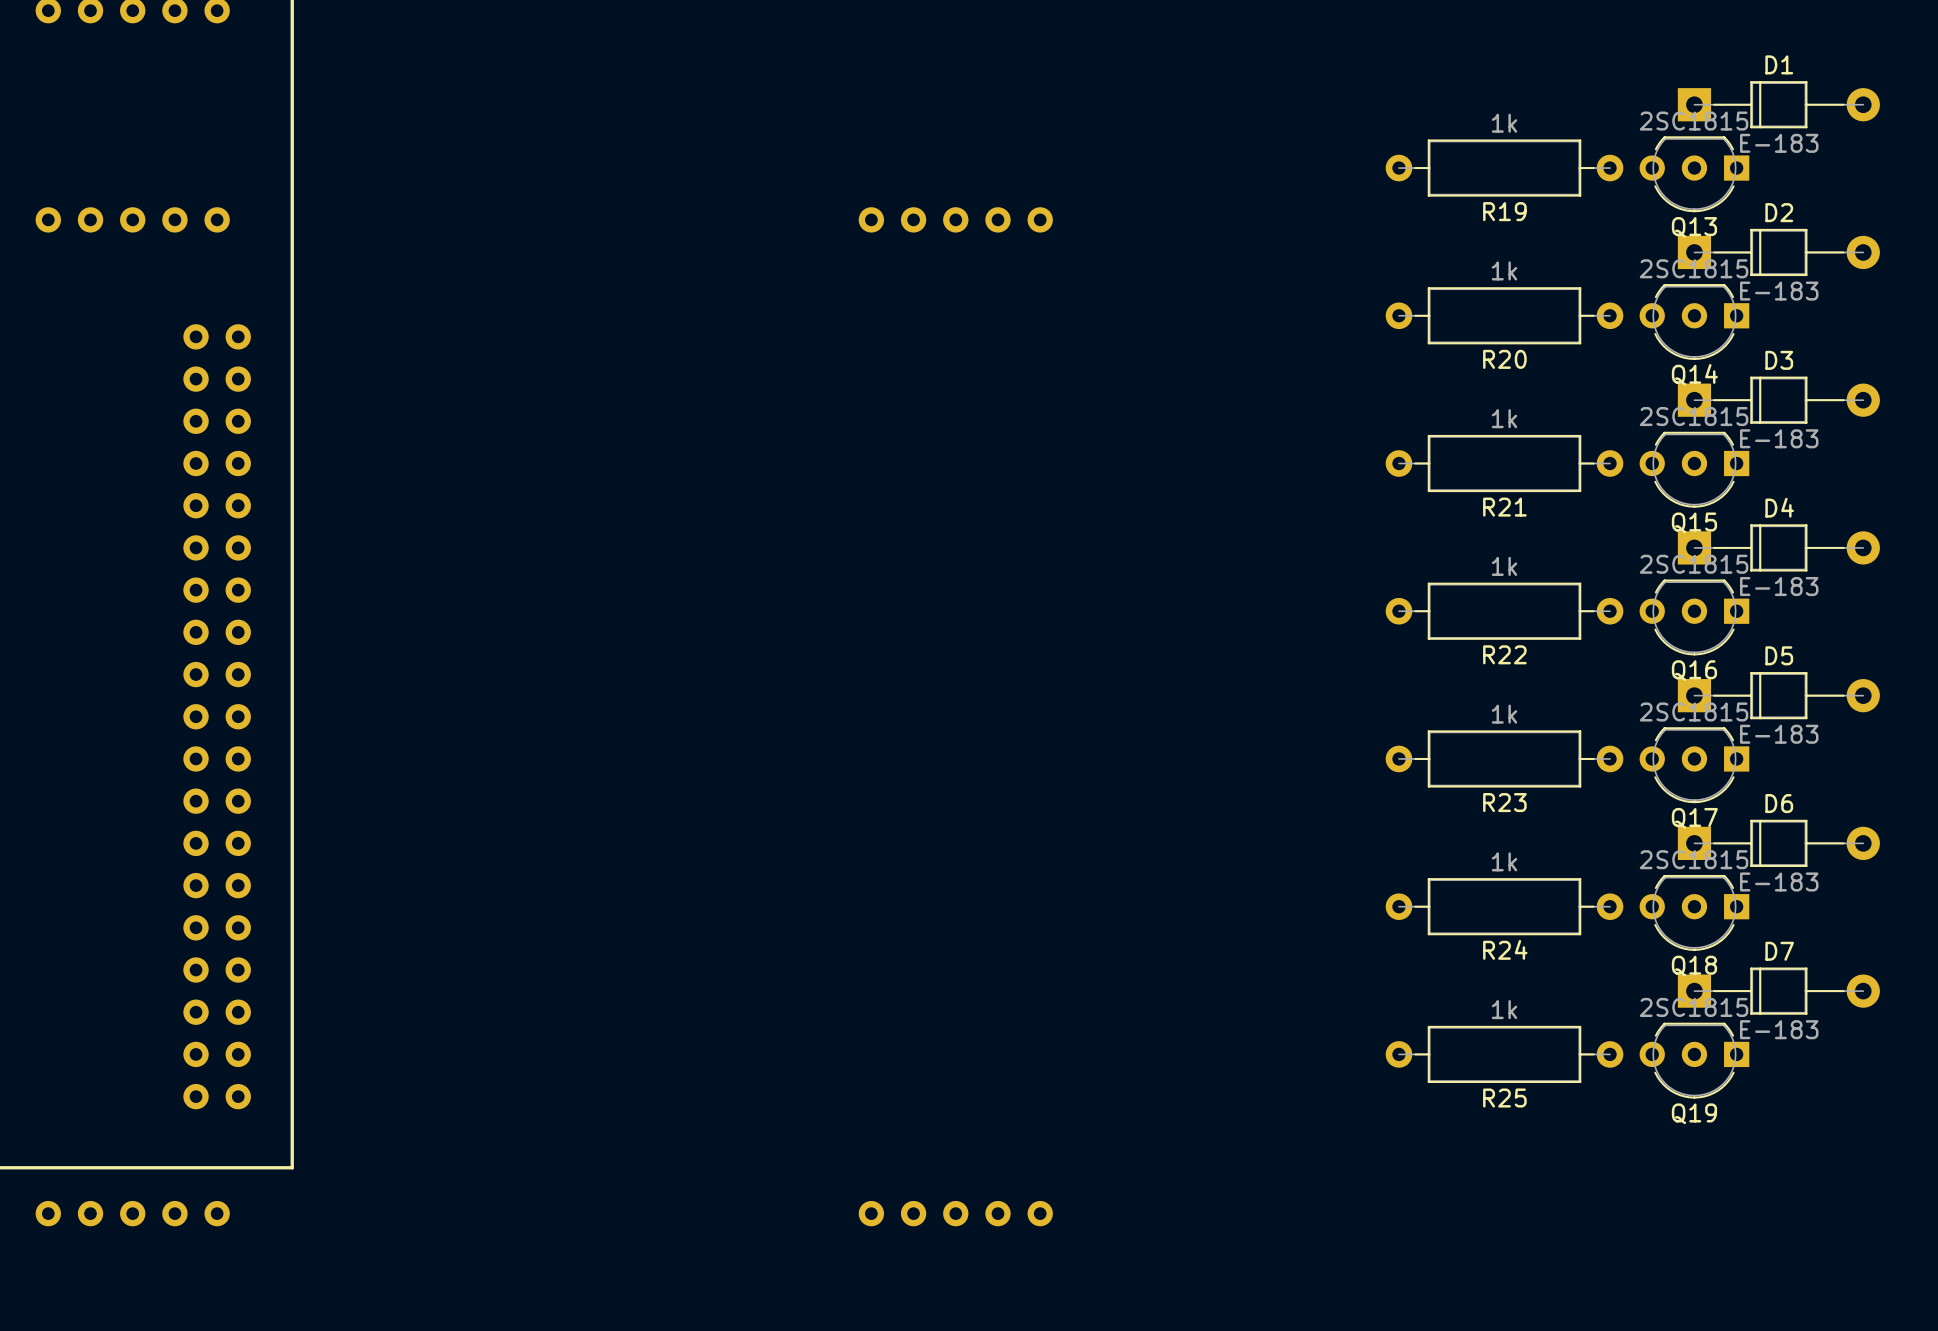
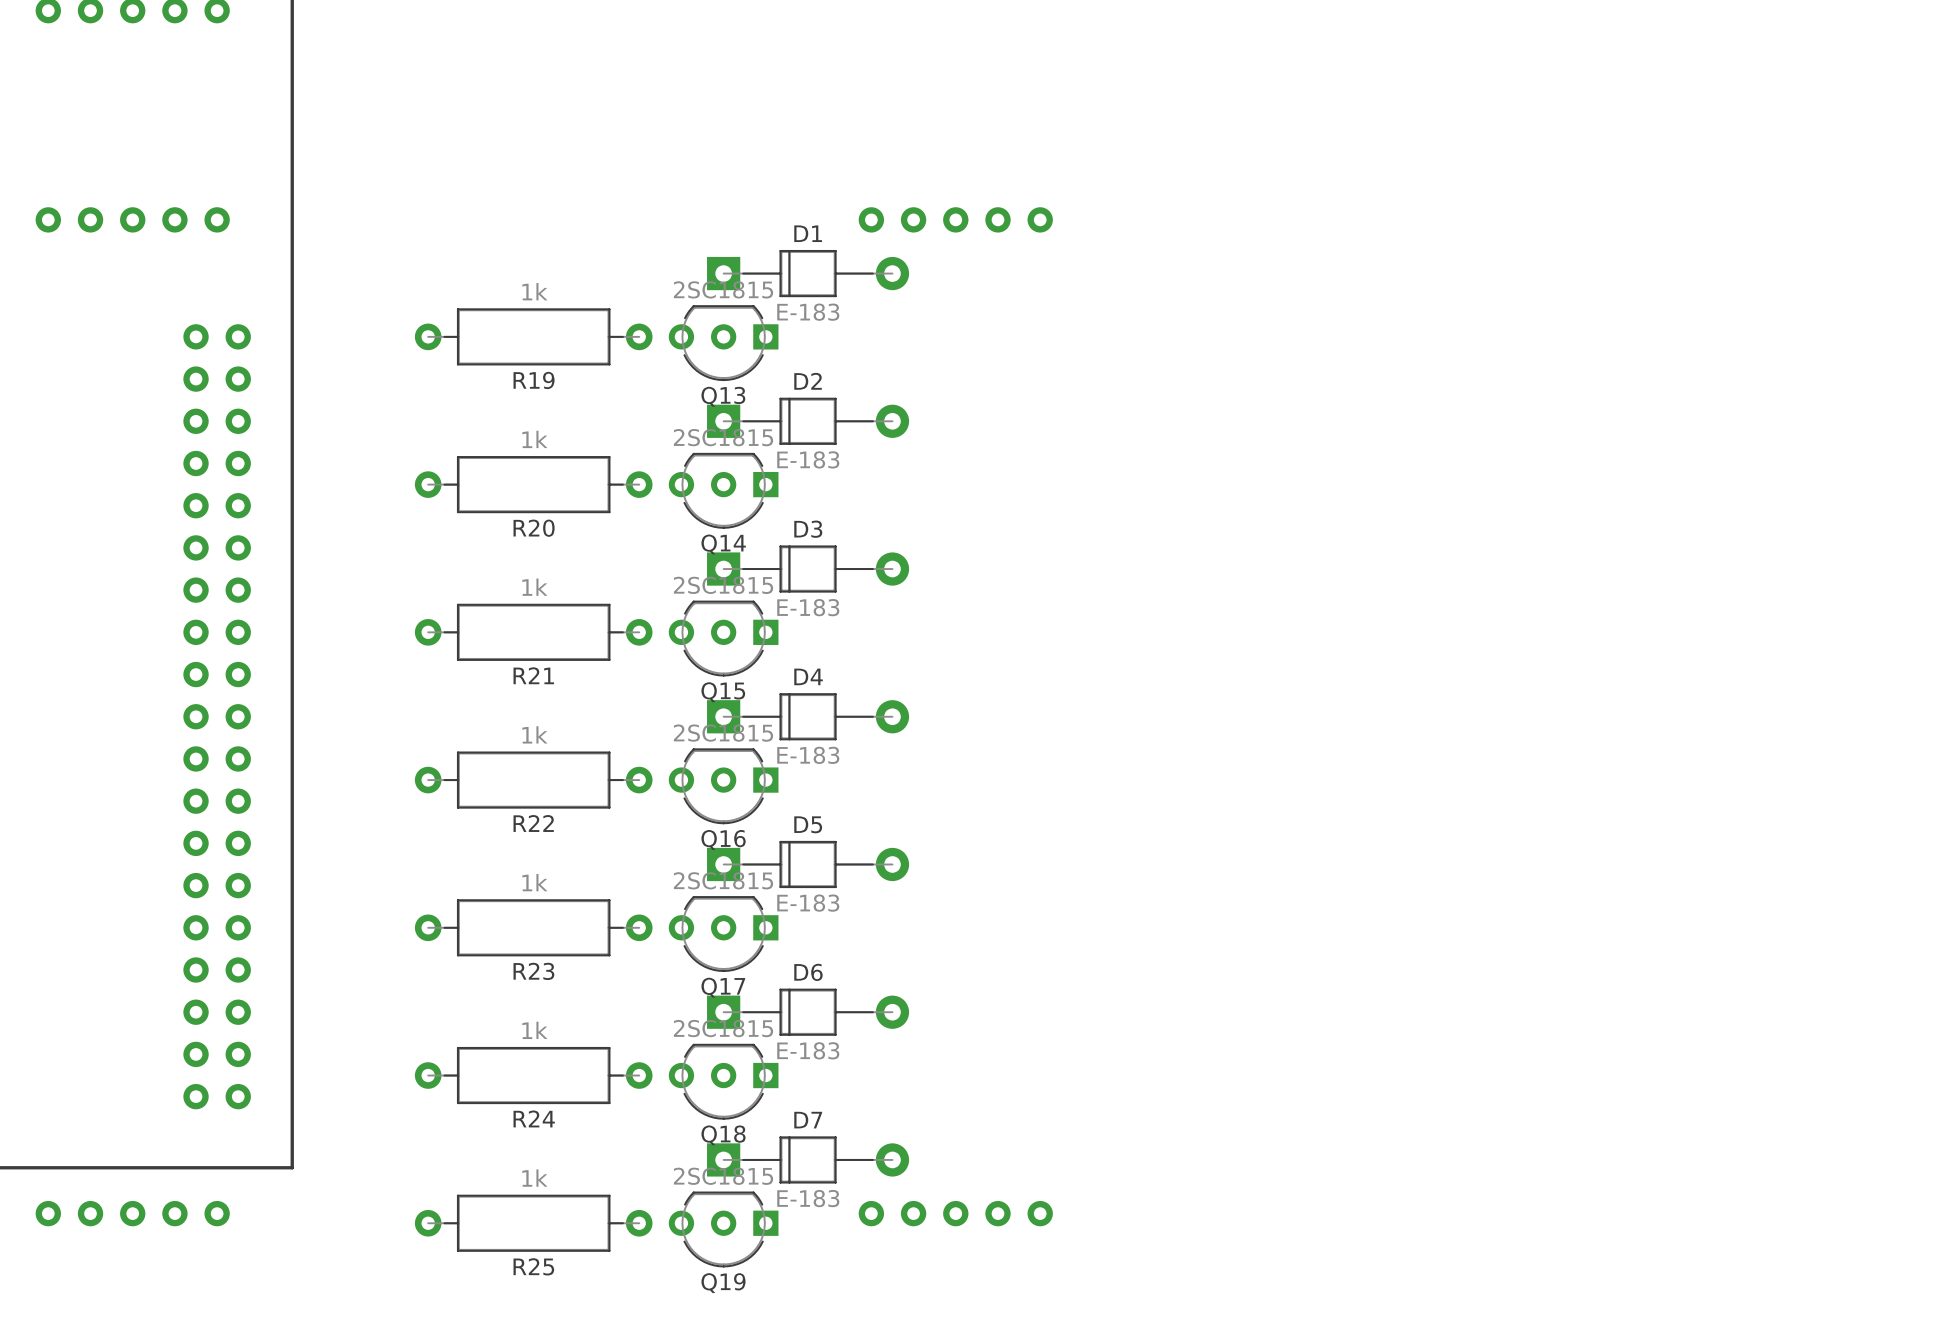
D1 position: (1778, 104) -> (808, 273)
R19 position: (1504, 168) -> (533, 336)
Q13 position: (1694, 174) -> (723, 343)
D2 position: (1778, 252) -> (808, 421)
R20 position: (1504, 315) -> (533, 484)
Q14 position: (1694, 322) -> (723, 490)
D3 position: (1778, 400) -> (808, 569)
R21 position: (1504, 463) -> (533, 632)
Q15 position: (1694, 469) -> (723, 638)
D4 position: (1778, 547) -> (808, 716)
R22 position: (1504, 611) -> (533, 780)
Q16 position: (1694, 617) -> (723, 786)
D5 position: (1778, 695) -> (808, 864)
R23 position: (1504, 758) -> (533, 927)
Q17 position: (1694, 765) -> (723, 934)
D6 position: (1778, 843) -> (808, 1012)
R24 position: (1504, 906) -> (533, 1075)
Q18 position: (1694, 912) -> (723, 1081)
D7 position: (1778, 991) -> (808, 1159)
R25 position: (1504, 1054) -> (533, 1223)
Q19 position: (1694, 1060) -> (723, 1229)

